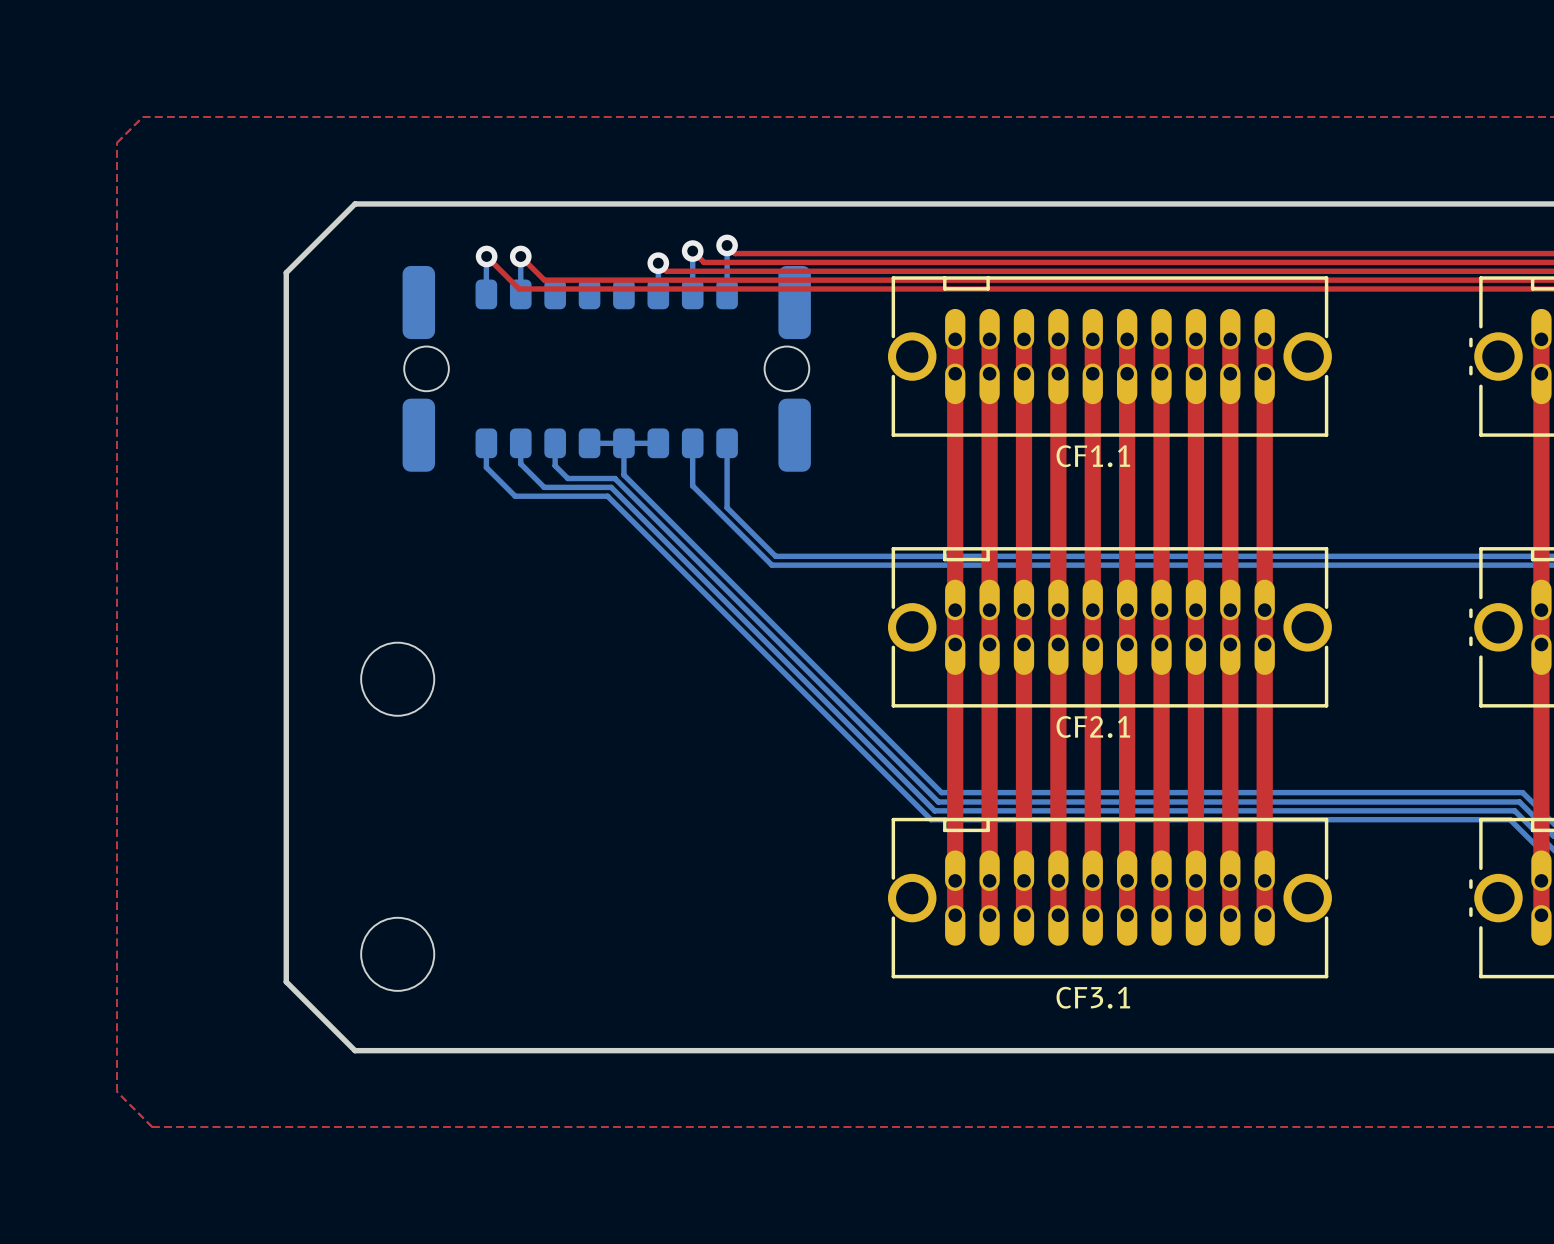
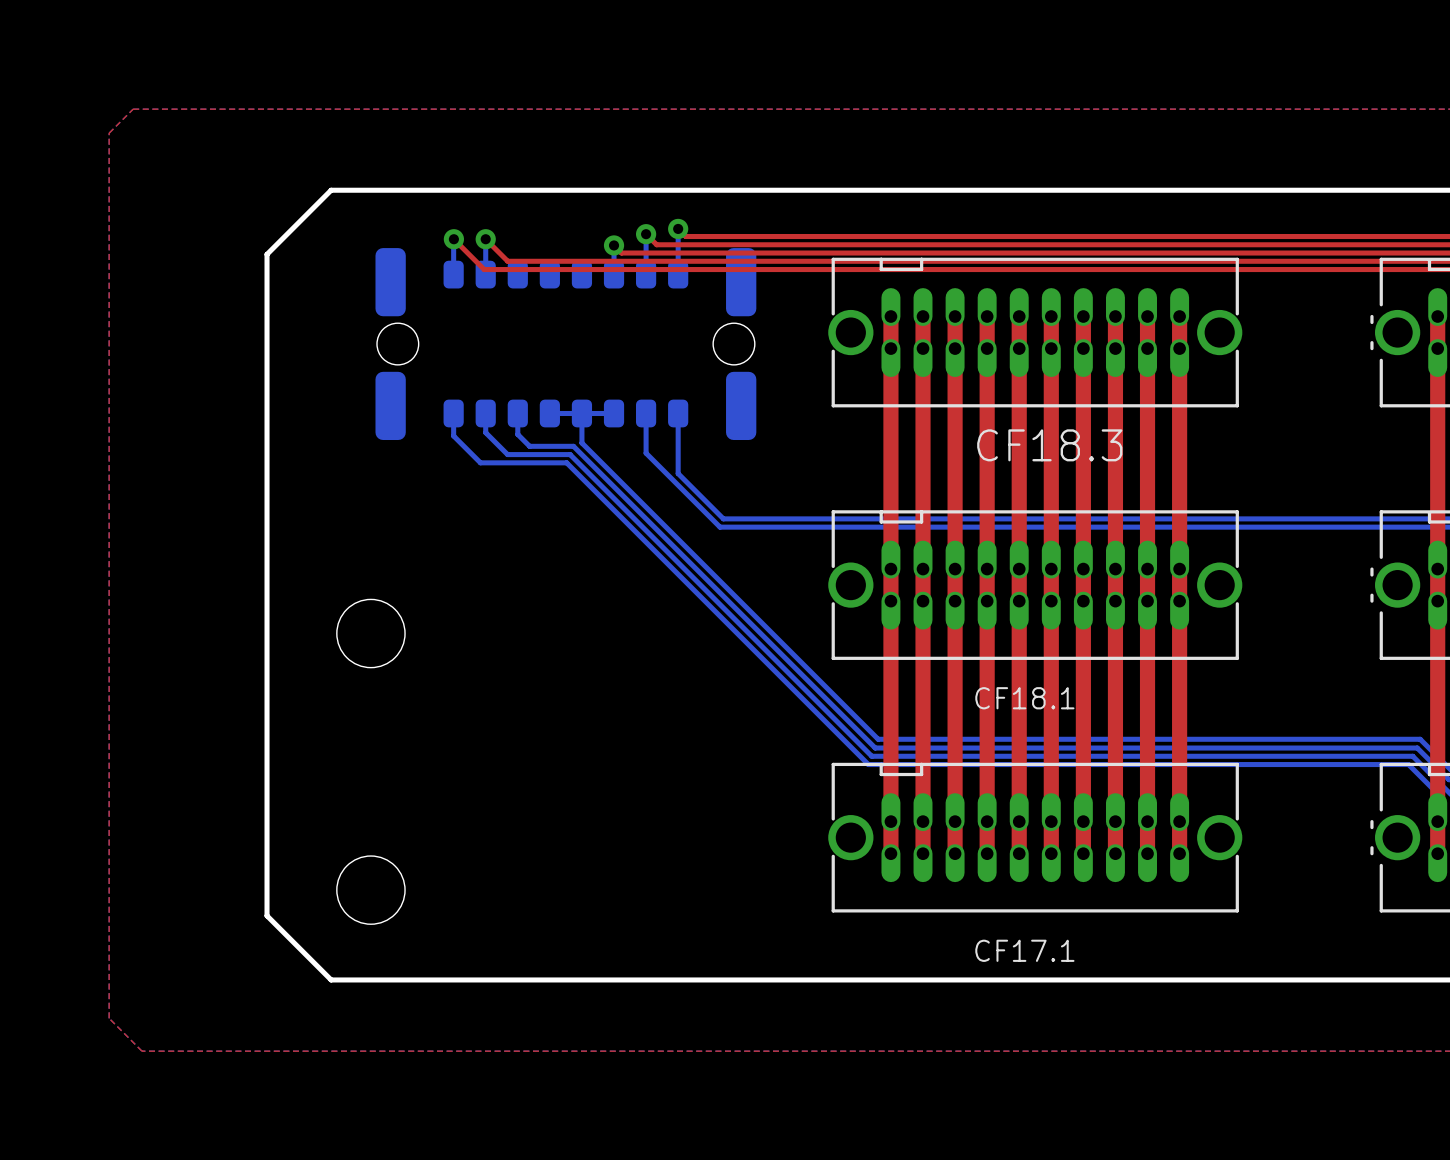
CF1.1 name: CF1.1 (1093, 456) -> CF18.3 (1049, 445)
CF2.1 name: CF2.1 (1093, 726) -> CF18.1 (1024, 698)
CF3.1 name: CF3.1 (1093, 997) -> CF17.1 (1024, 950)

